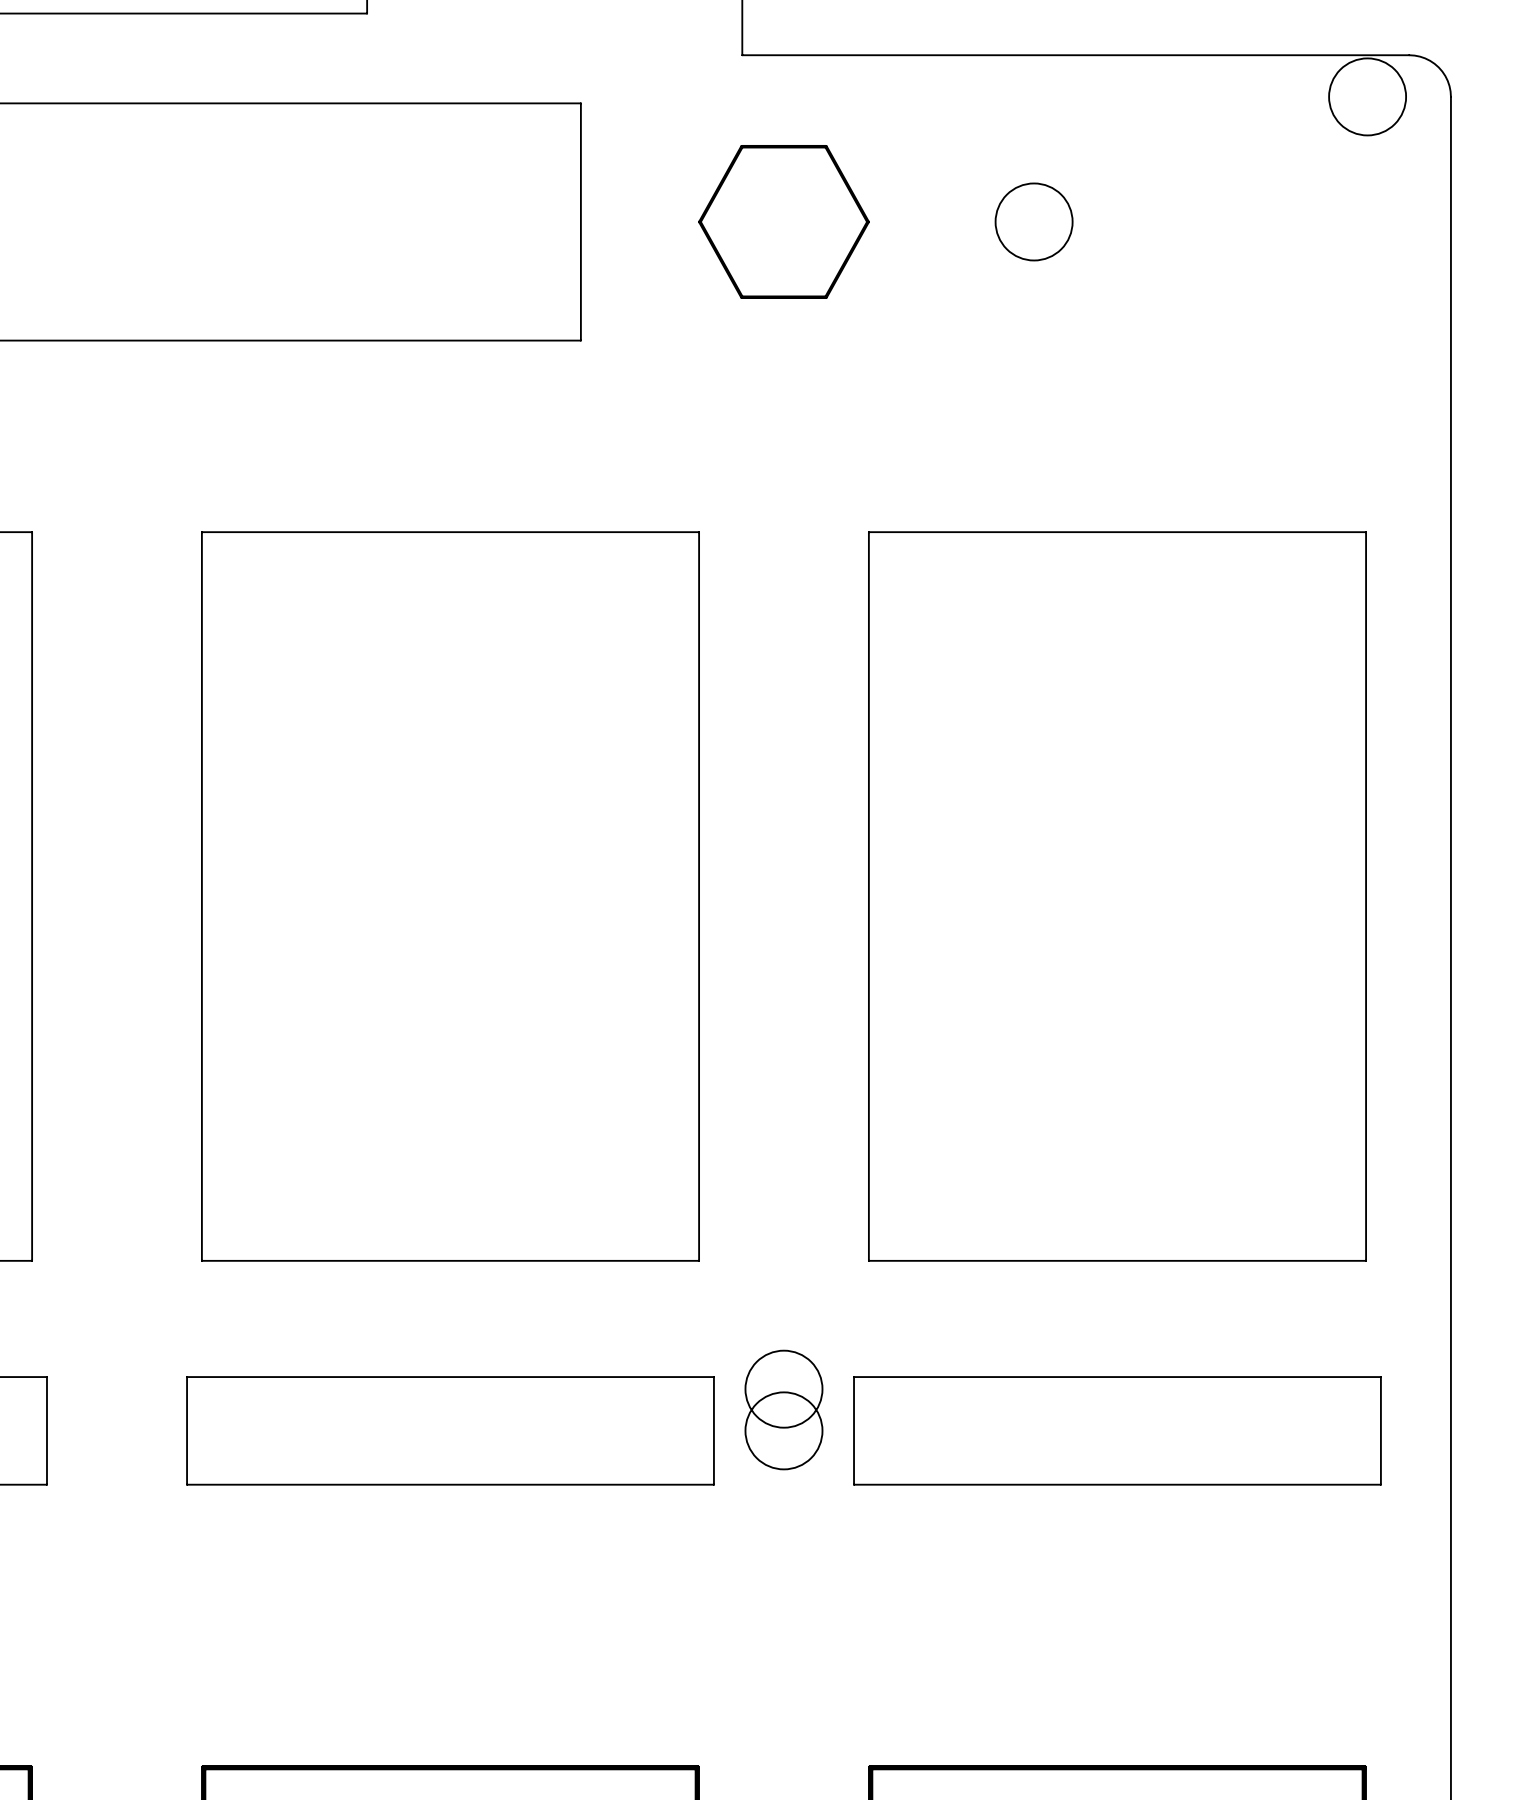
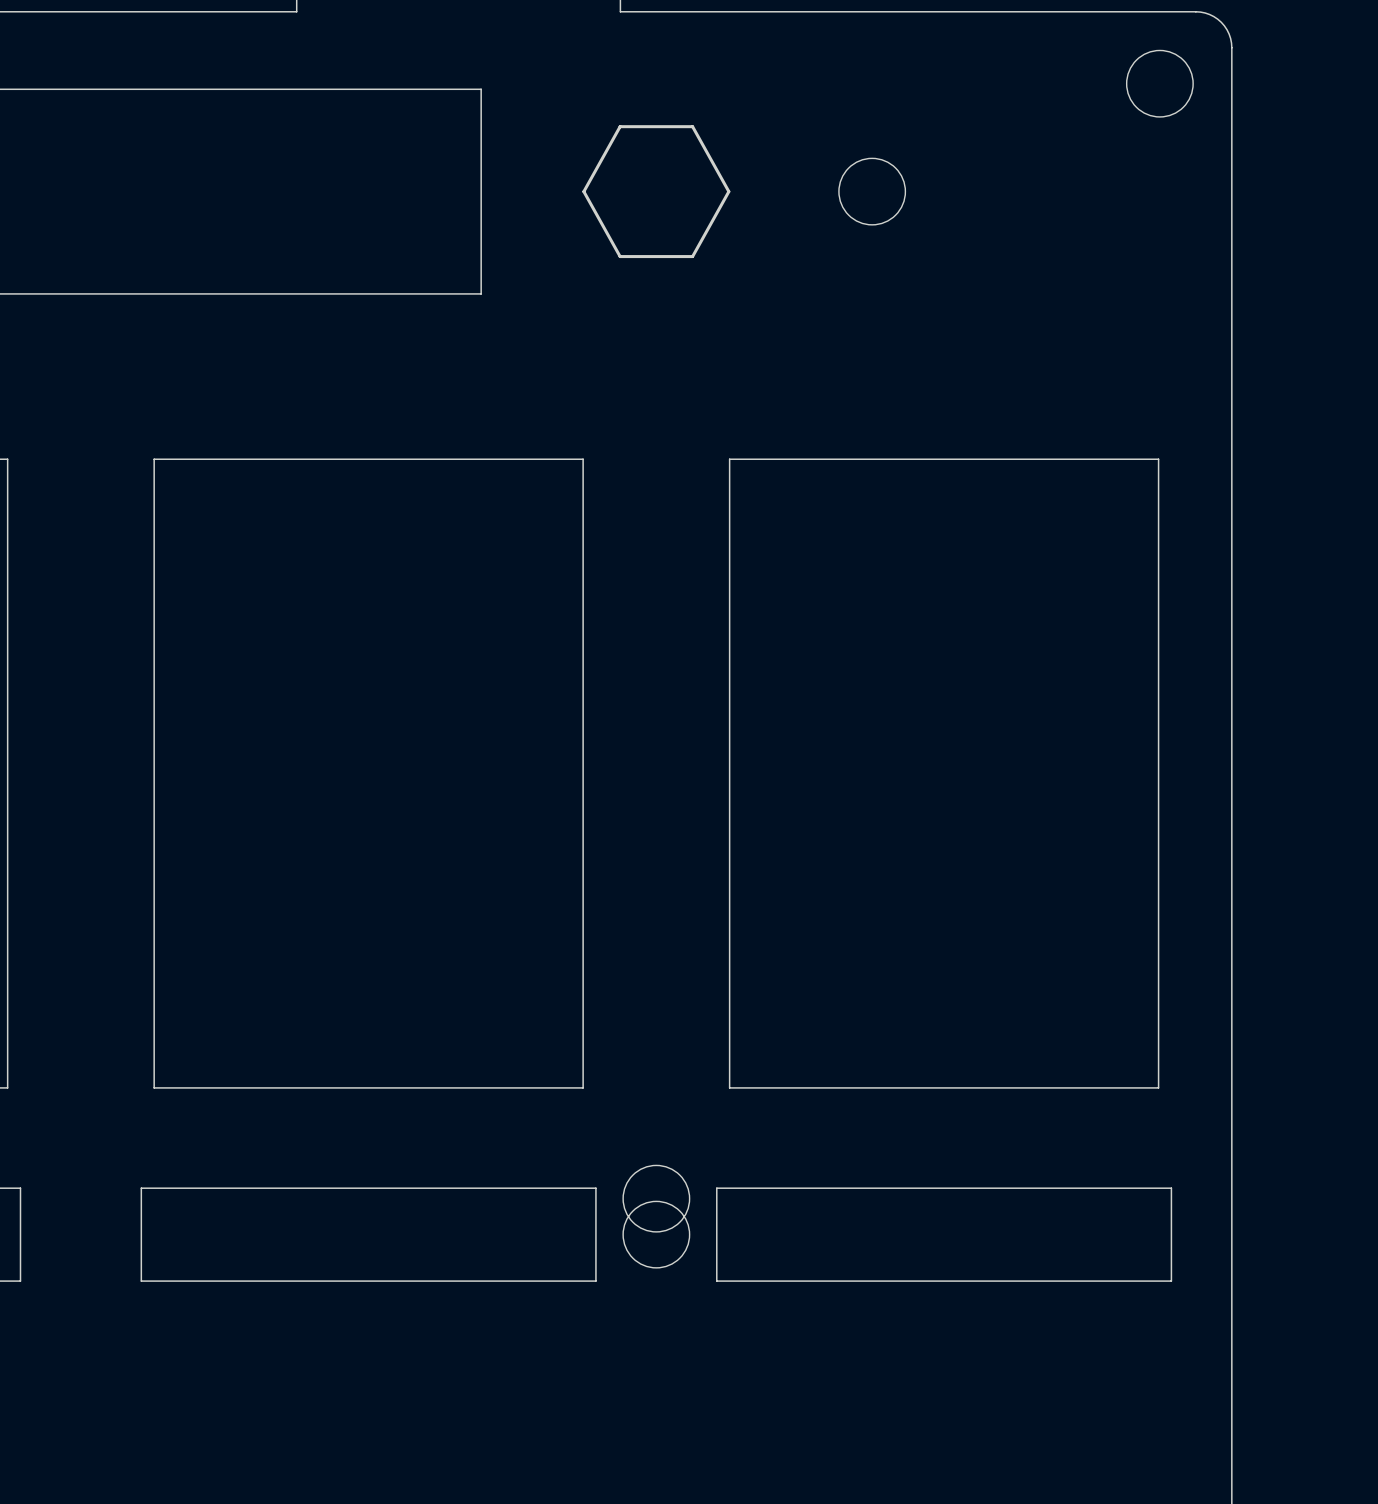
board edge: (742, 13) (742, 55) (1409, 55) (1425, 58) (1438, 67) (1447, 80) (1450, 96) -> (620, 11) (1200, 12) (1217, 19) (1229, 33) (1231, 47) (1231, 83)

